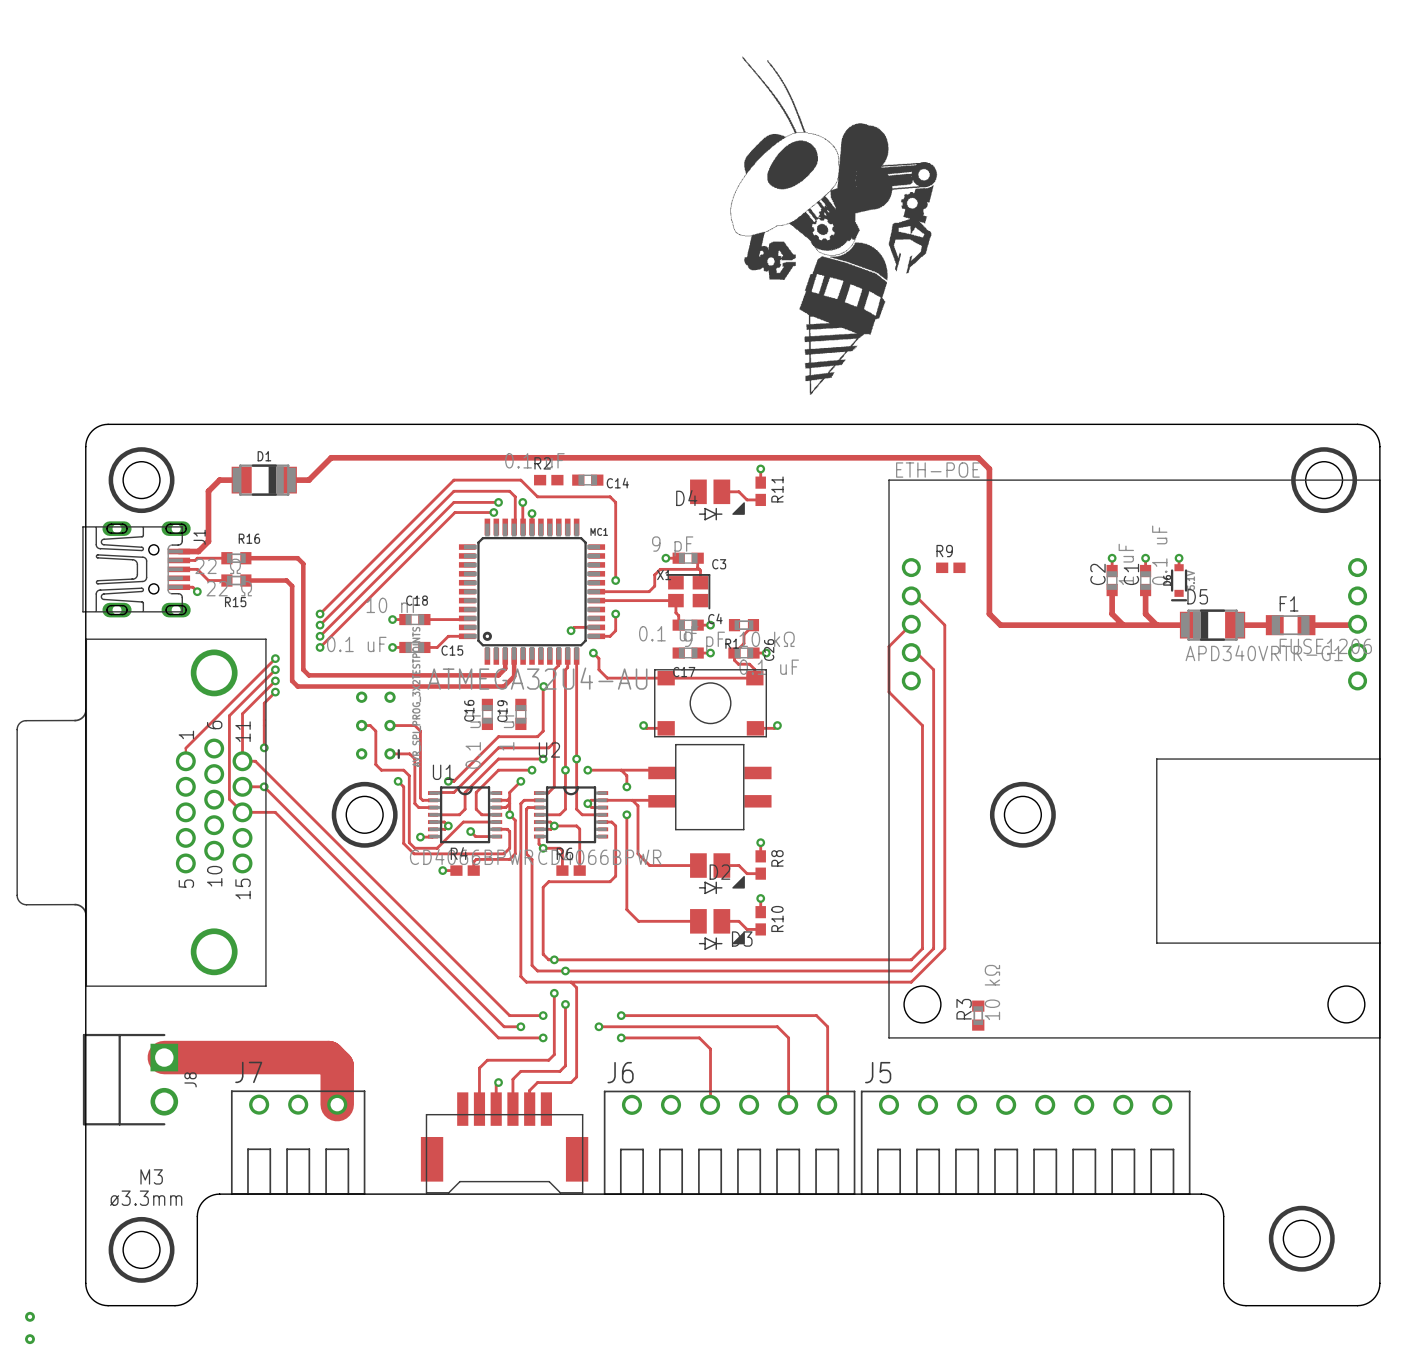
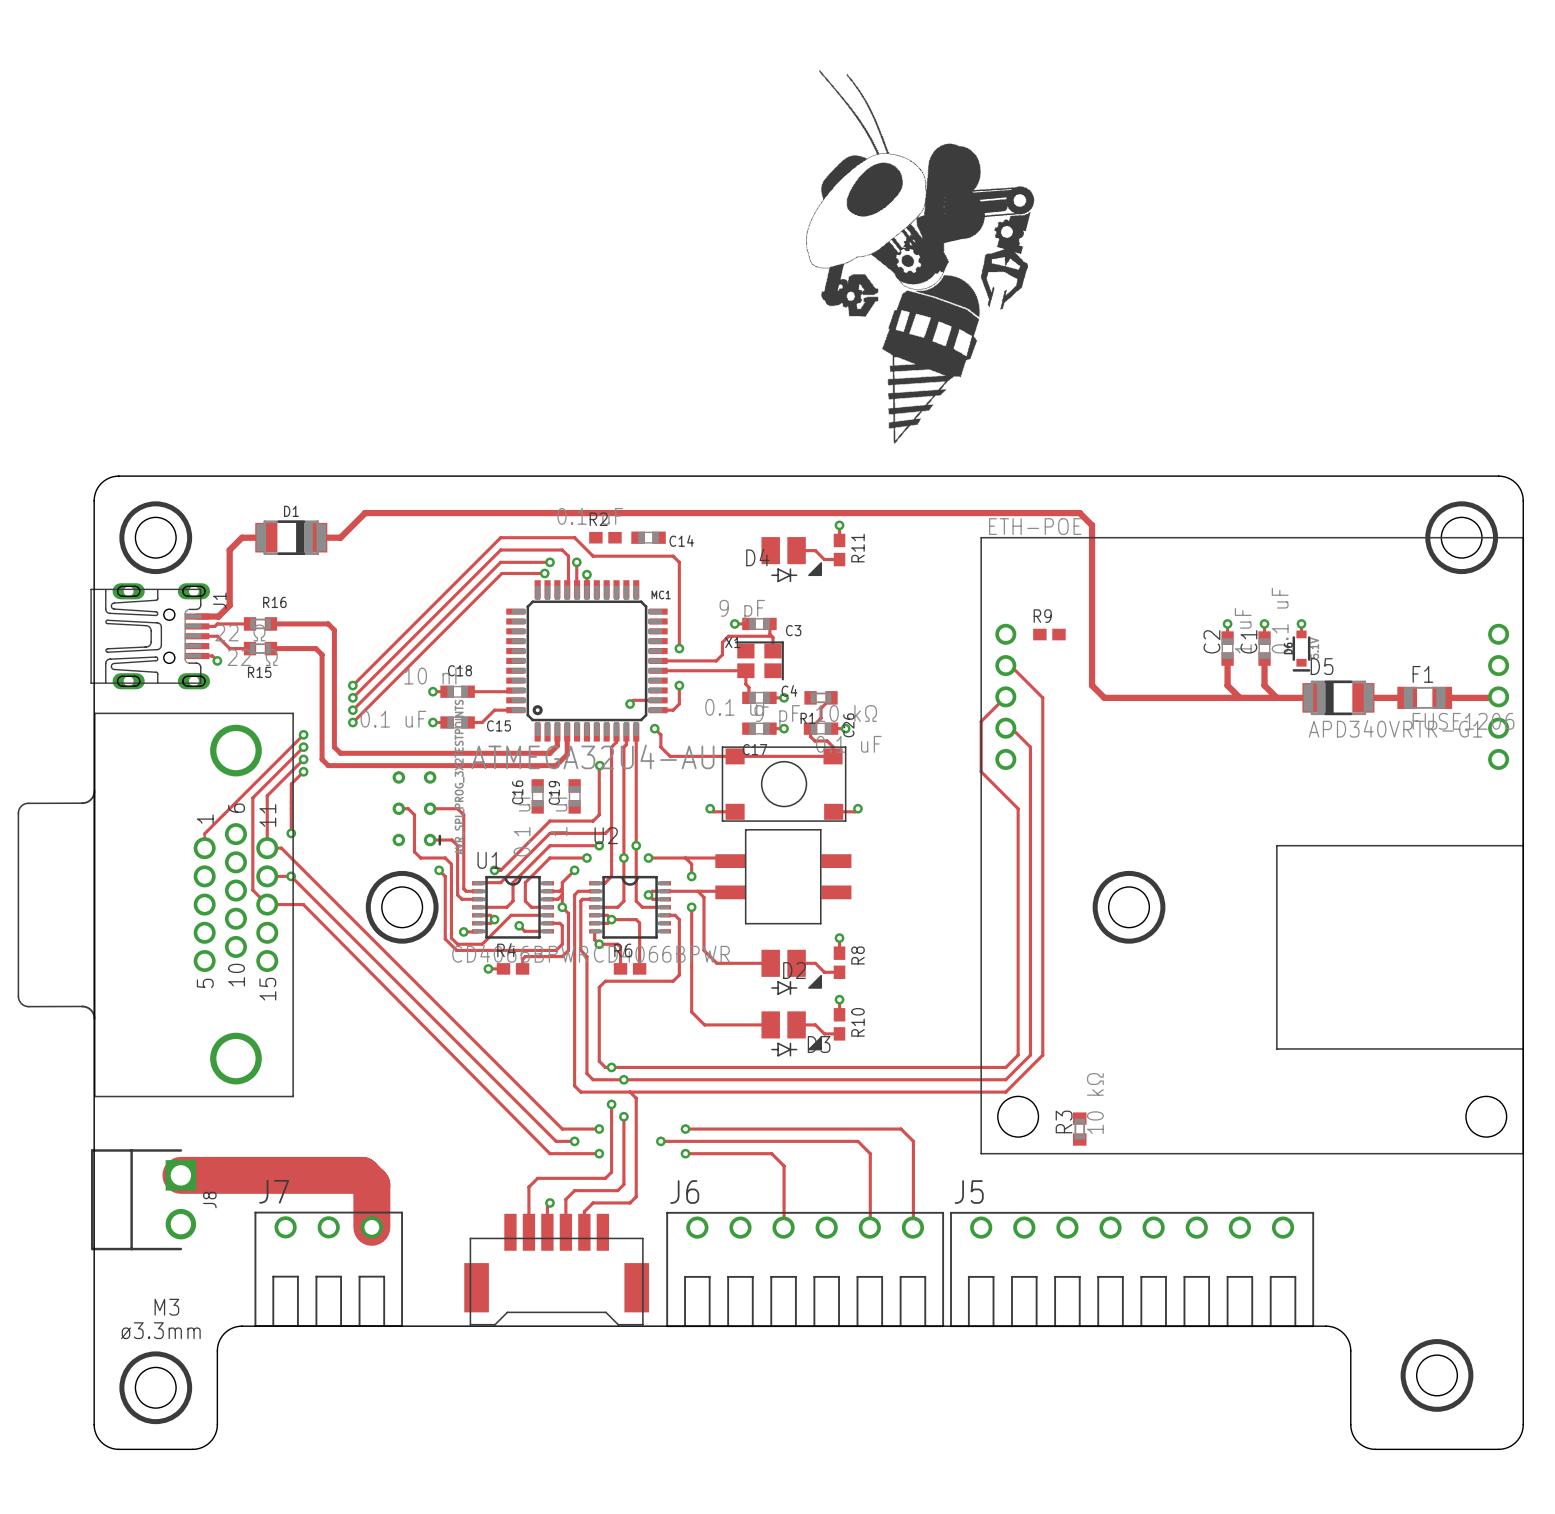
part: (29, 1316) -> none
part: (29, 1339) -> none

